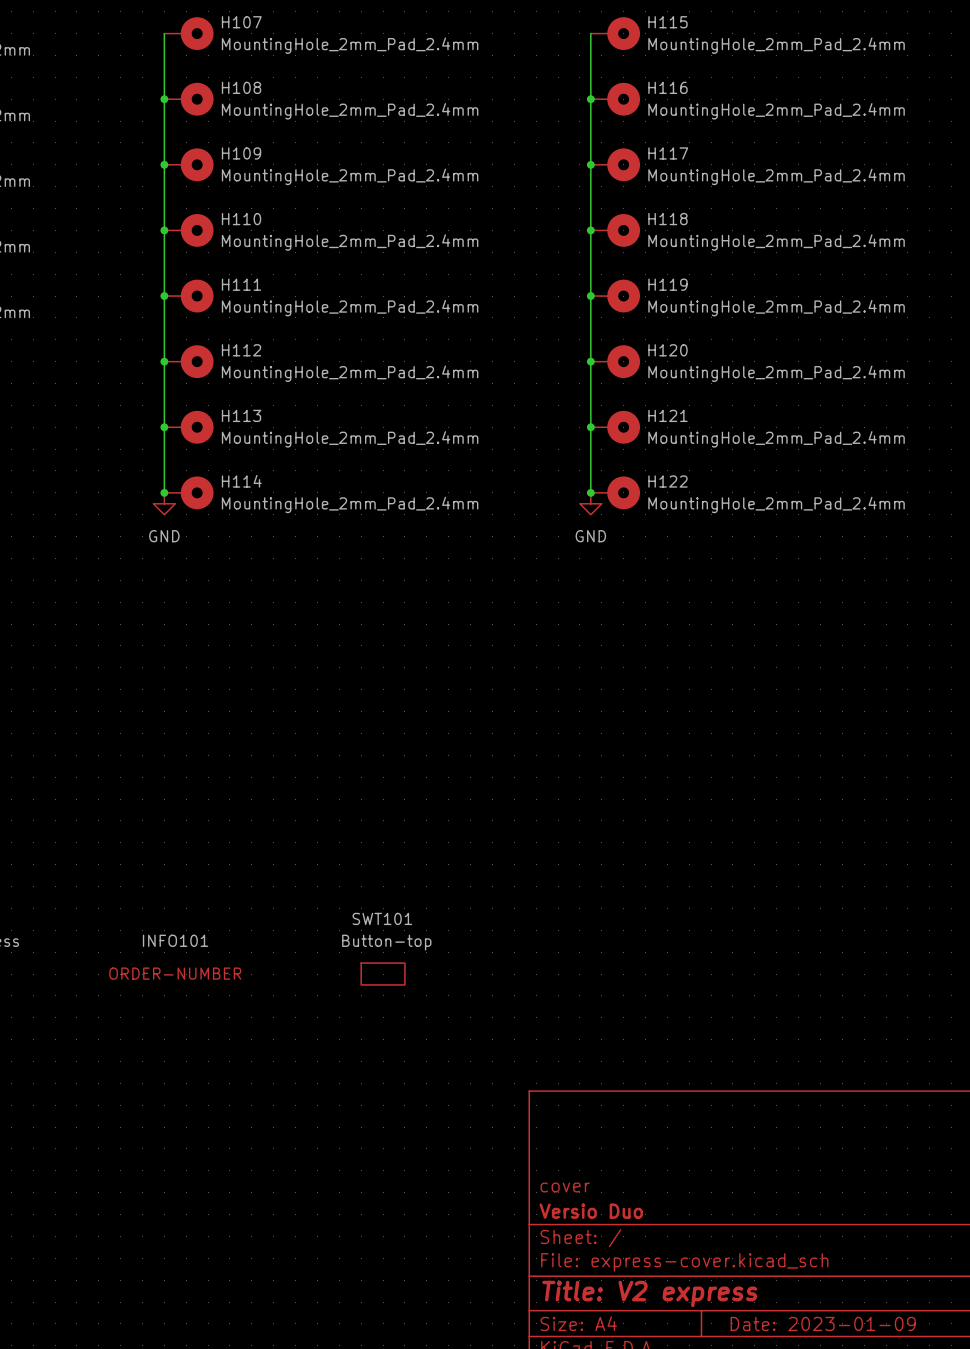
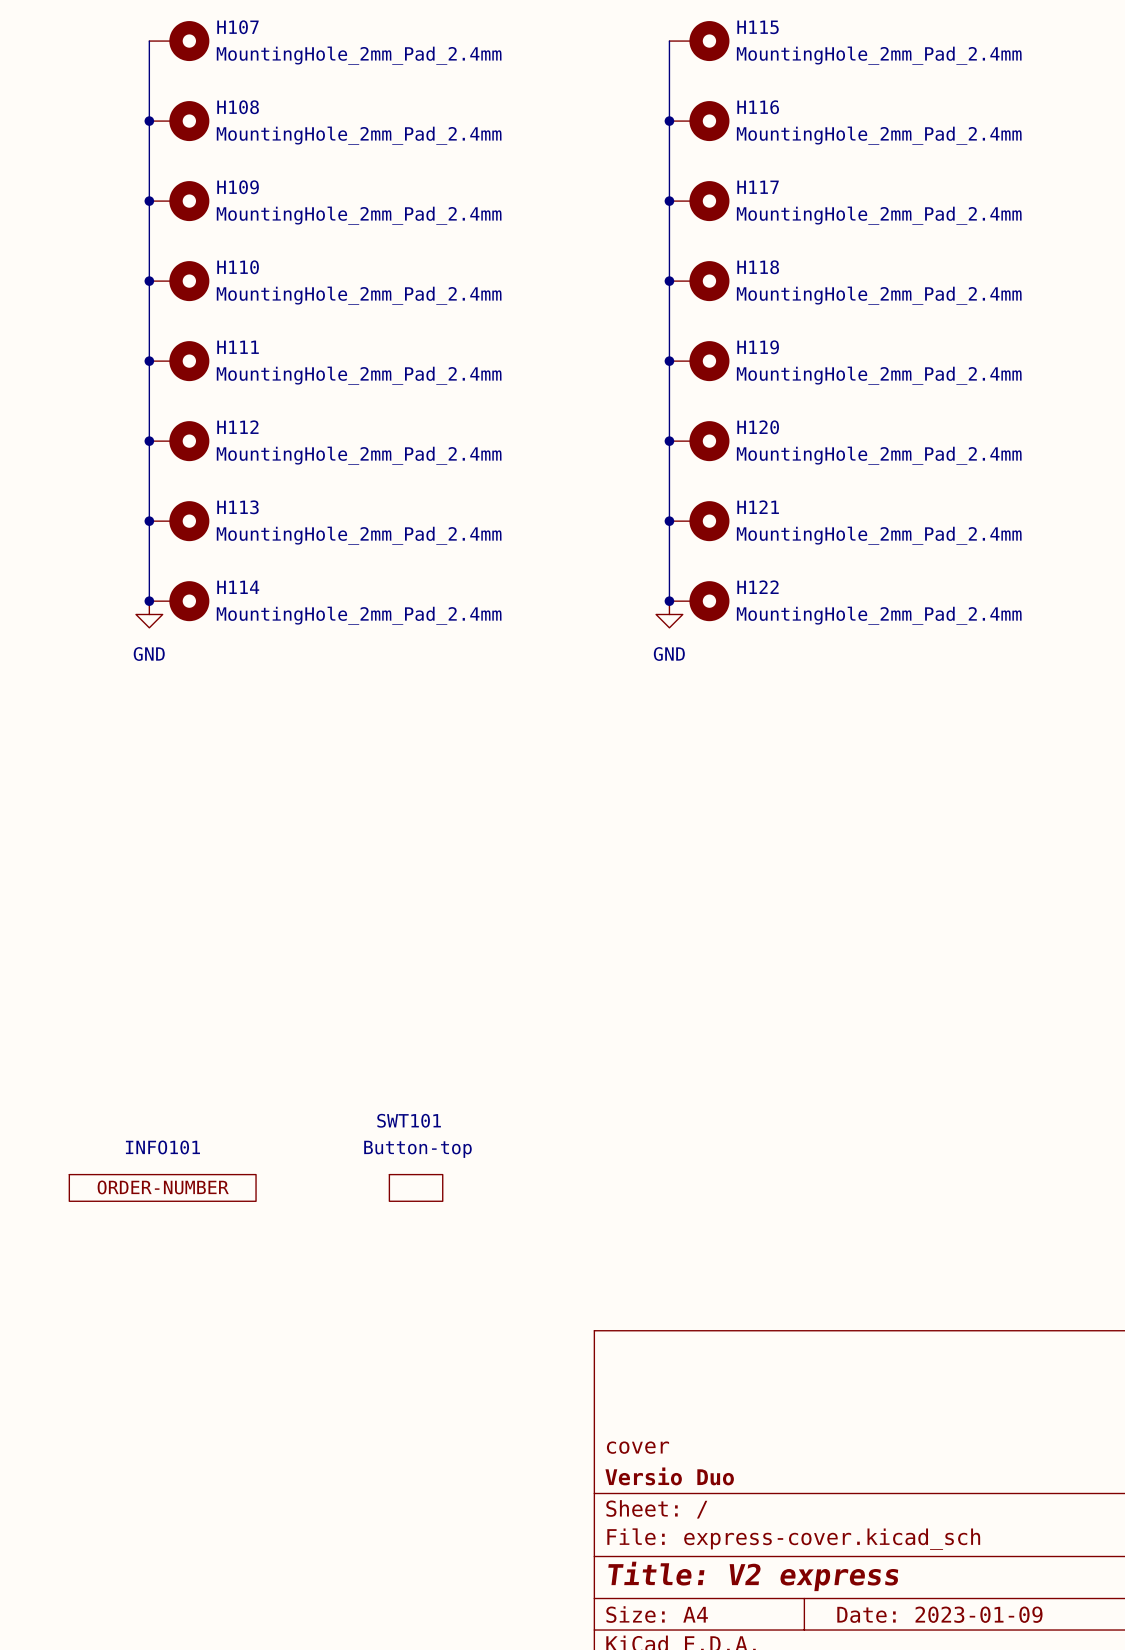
INFO101 symbol: [109, 934, 242, 980] -> [69, 1174, 257, 1202]

